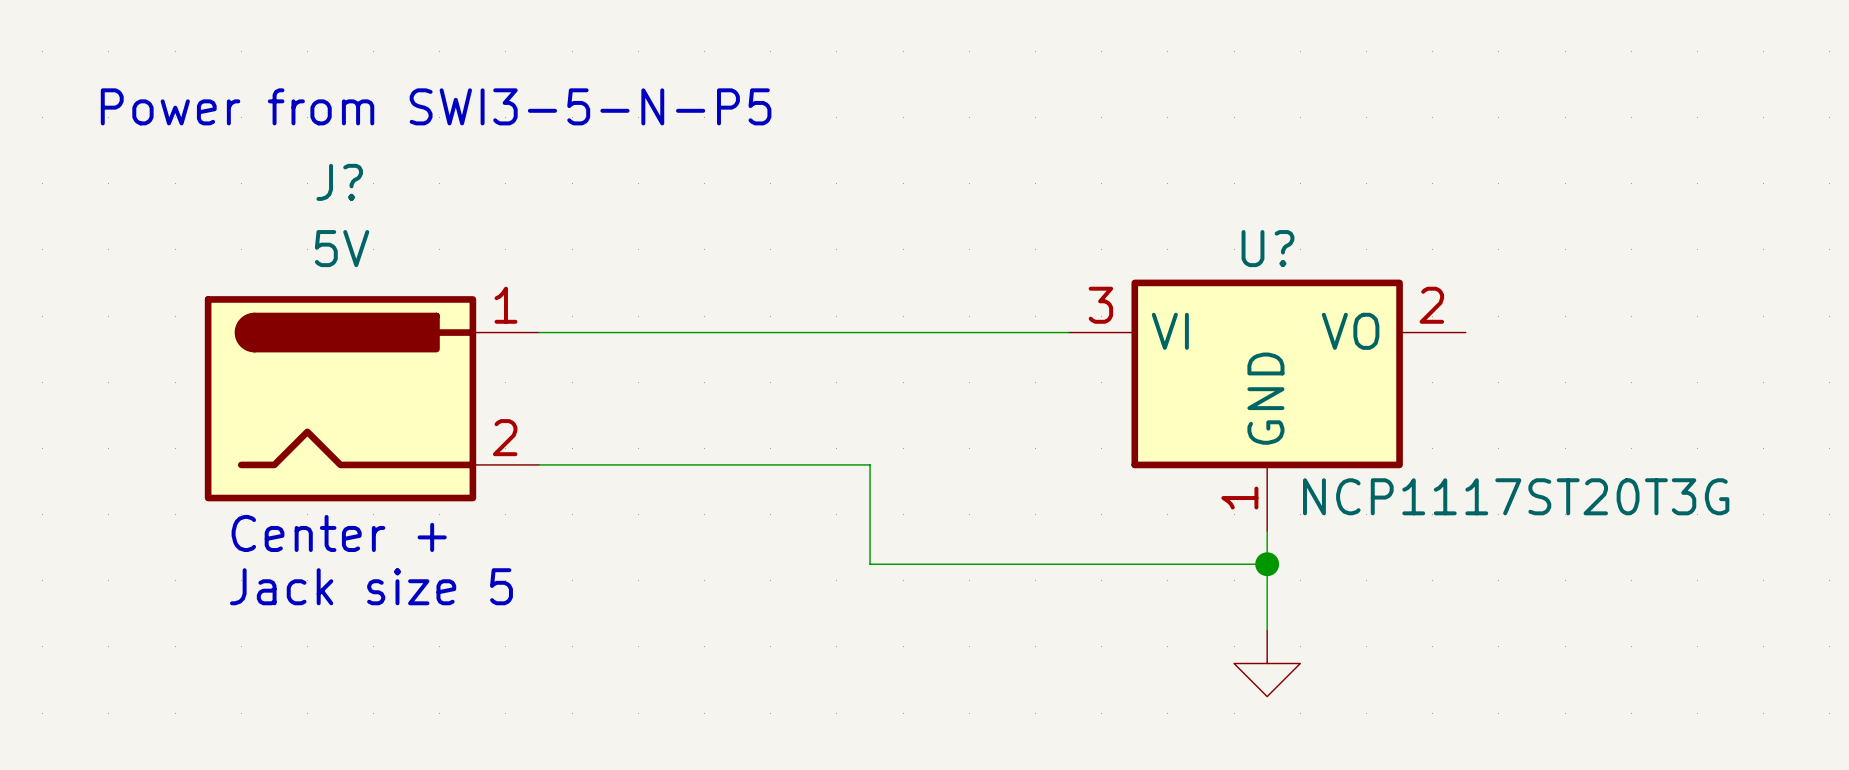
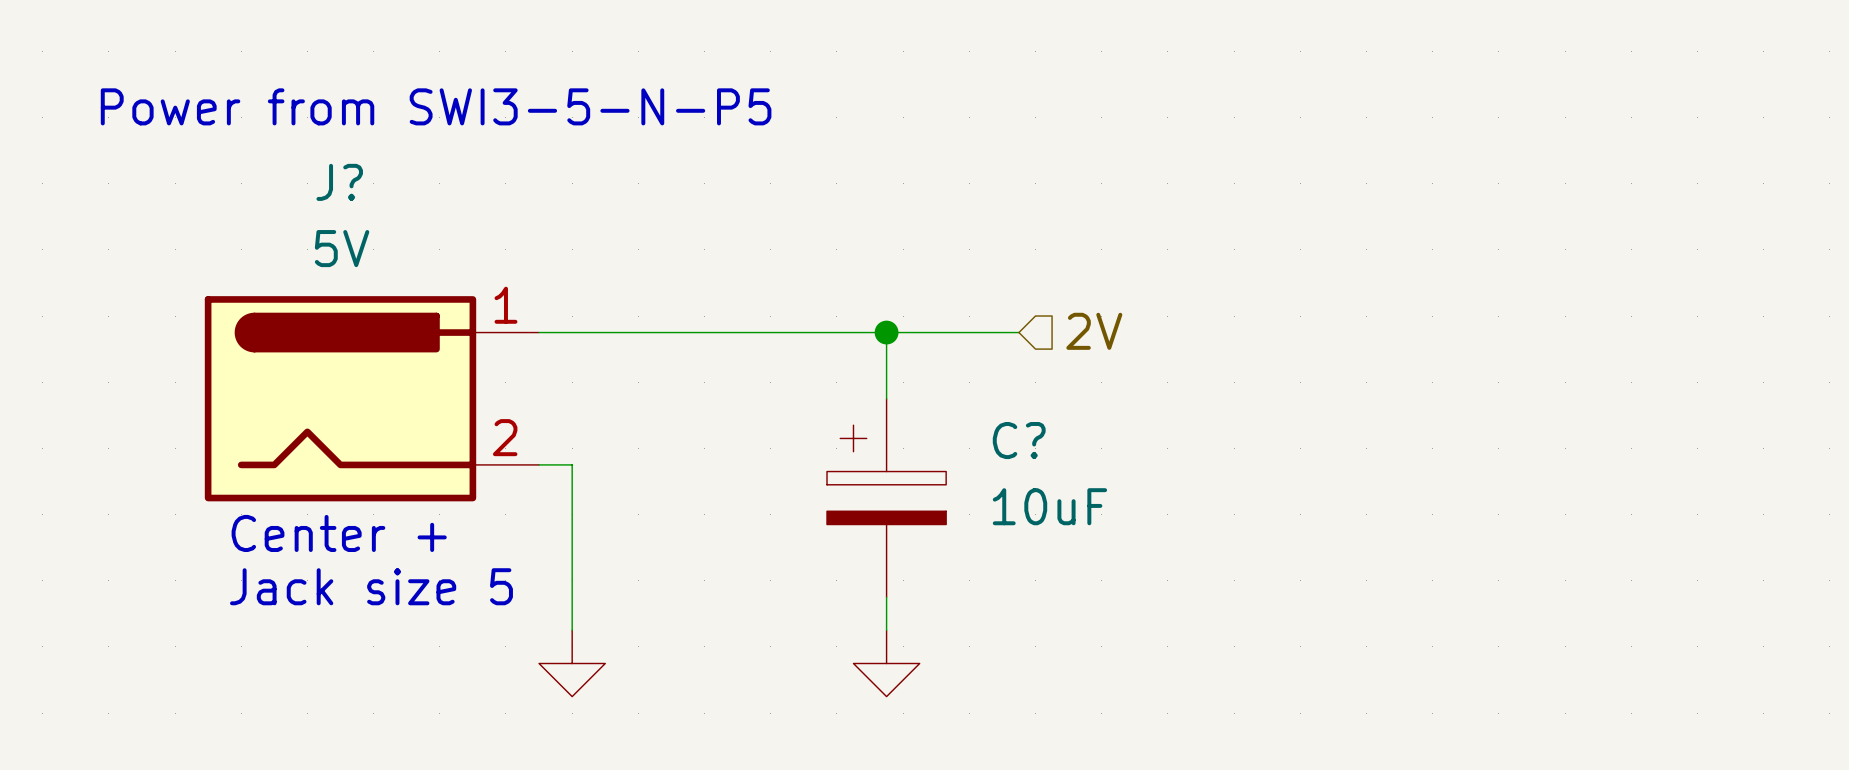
hierarchical label: none -> 2V (1094, 331)
wire: none -> (886, 332) (886, 398)
junction: none -> (886, 332)
wire: (1018, 332) (1068, 332) -> none
U?: NCP1117ST20T3G (1267, 405) -> none
wire: (572, 464) (870, 464) (870, 564) (1267, 564) -> (572, 464) (572, 630)
C?: none -> 10uF (886, 498)
wire: (1267, 531) (1267, 630) -> none
junction: (1267, 564) -> none
wire: none -> (886, 597) (886, 630)
power symbol: none -> (572, 663)
power symbol: none -> (886, 663)
power symbol: (1267, 663) -> none

